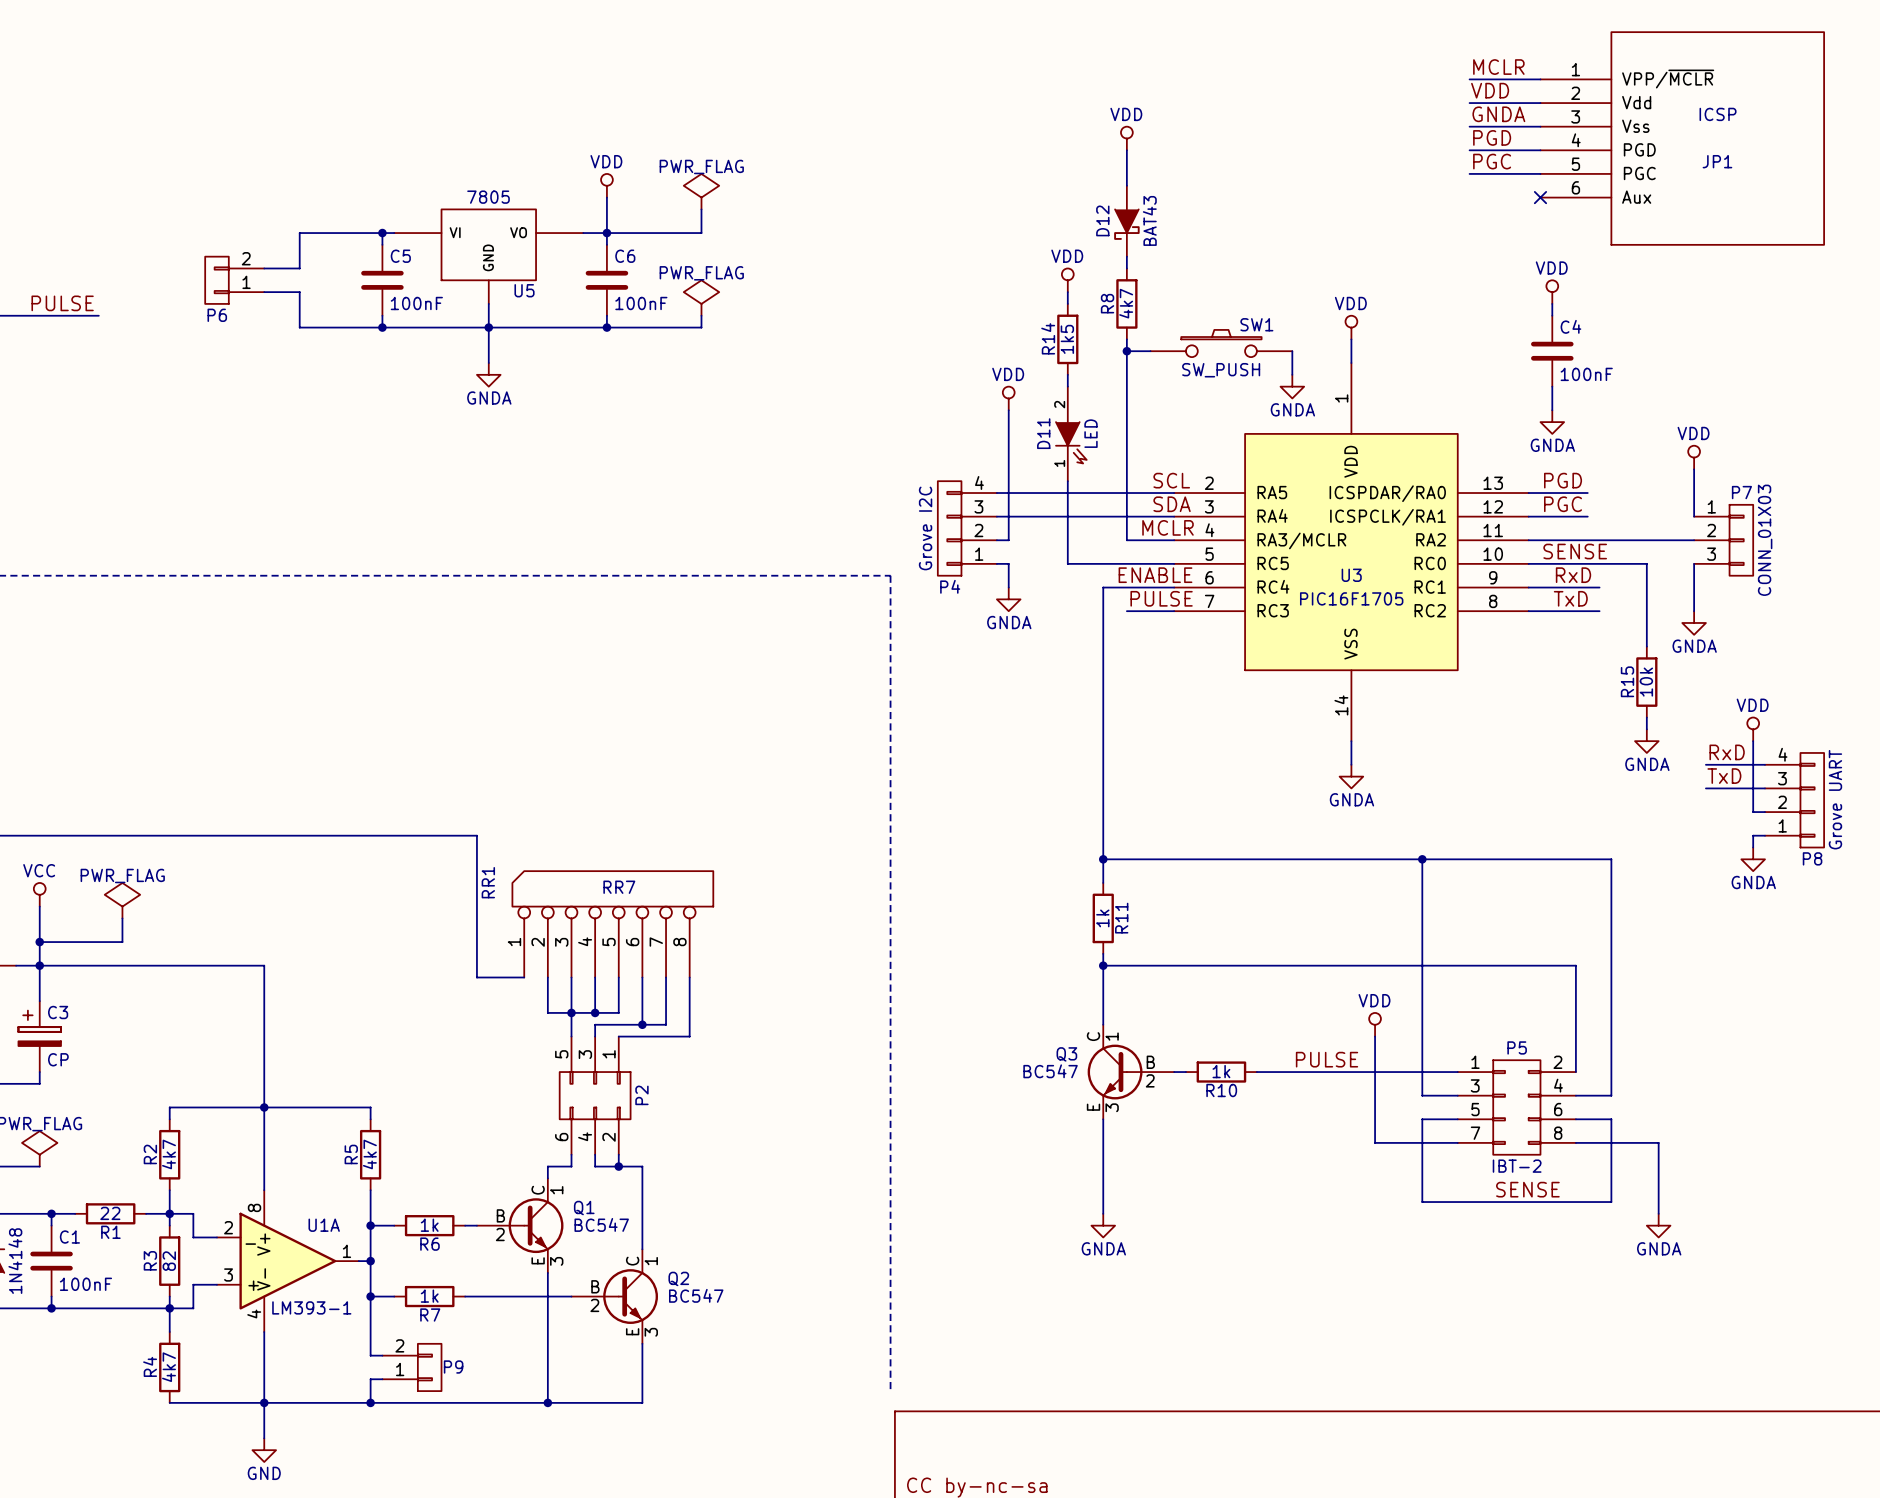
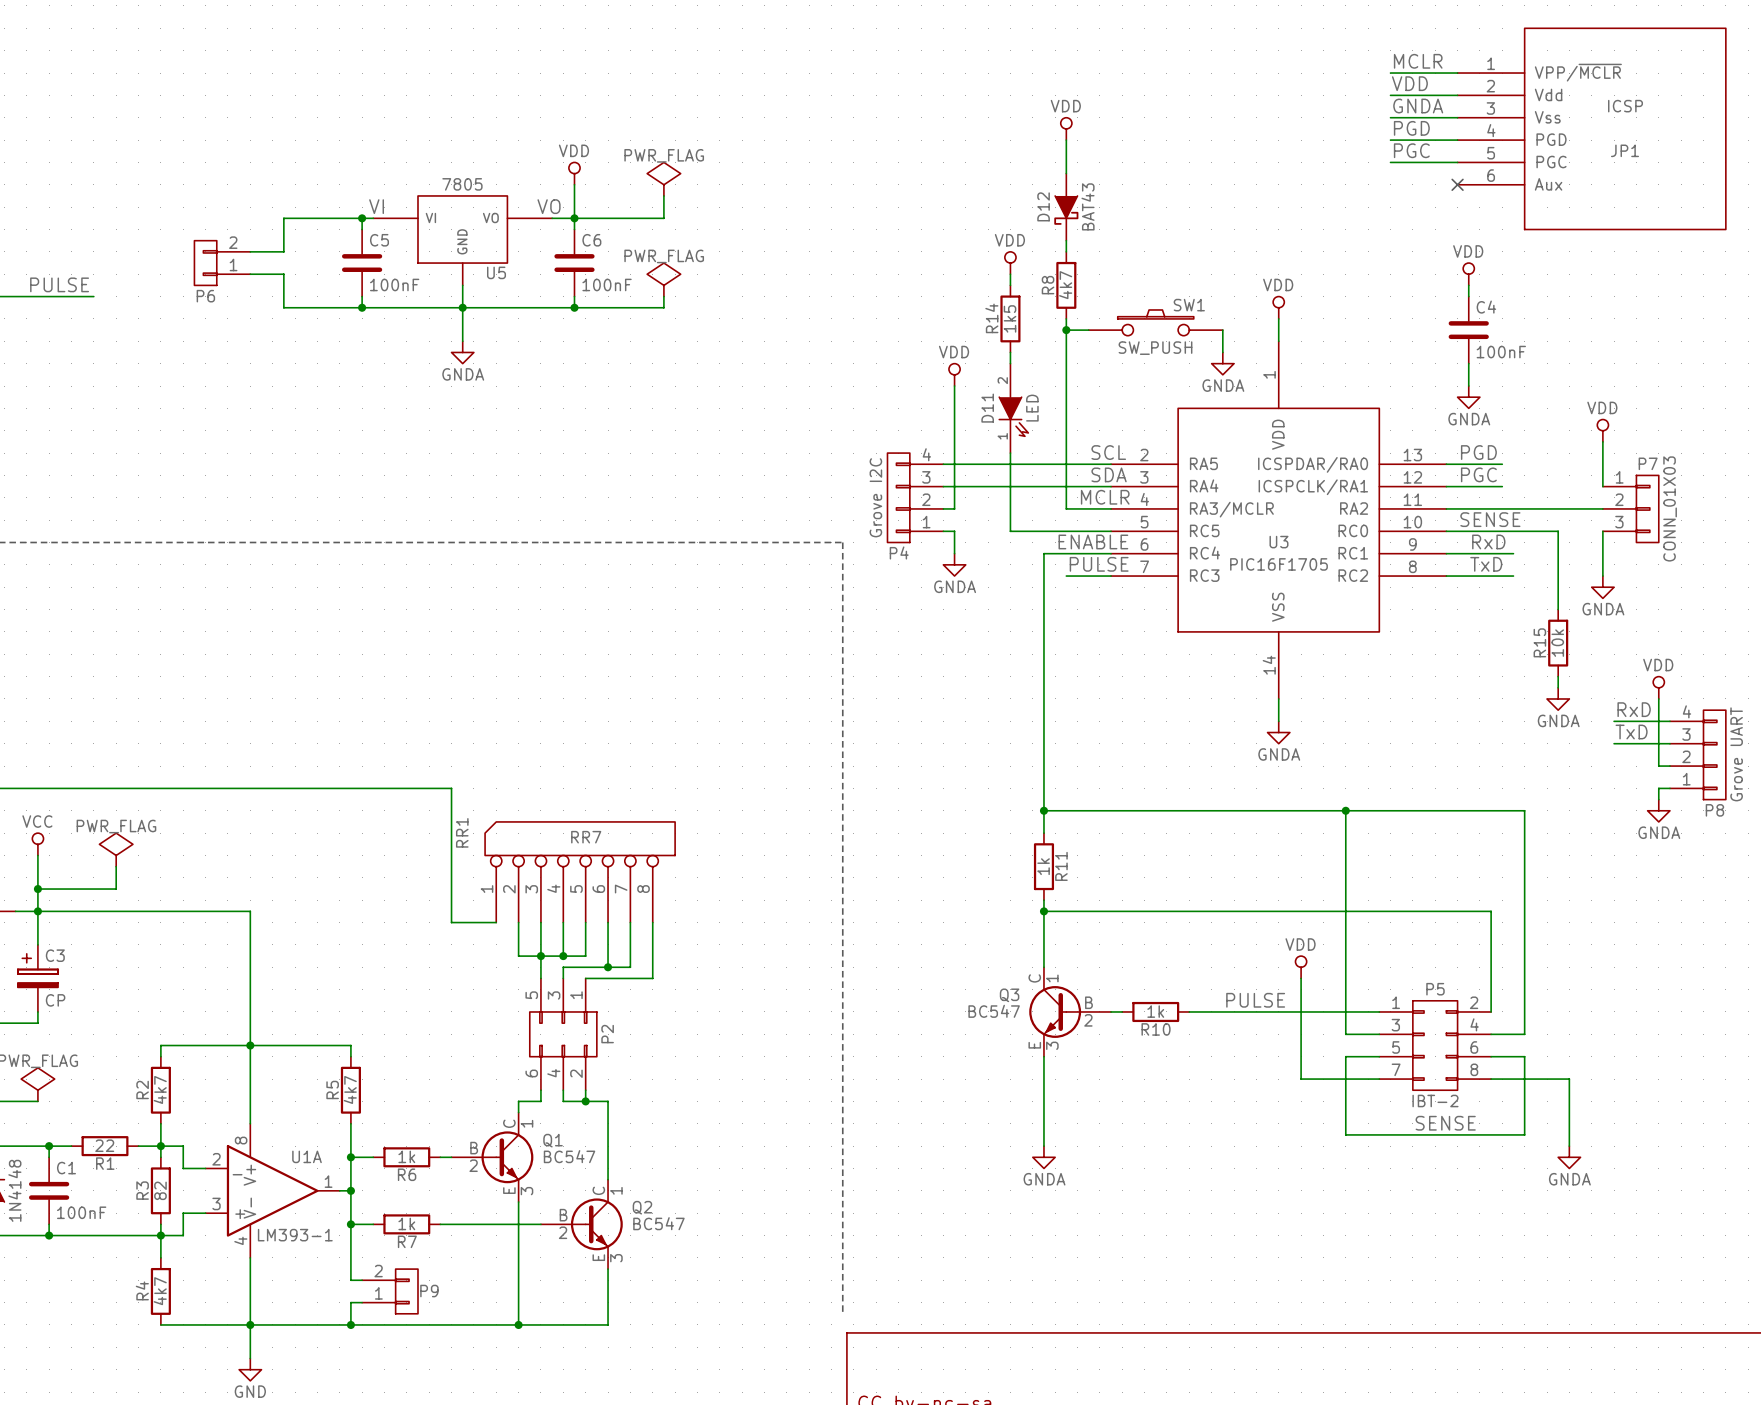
label: none -> VI (376, 206)
label: none -> VO (549, 206)

